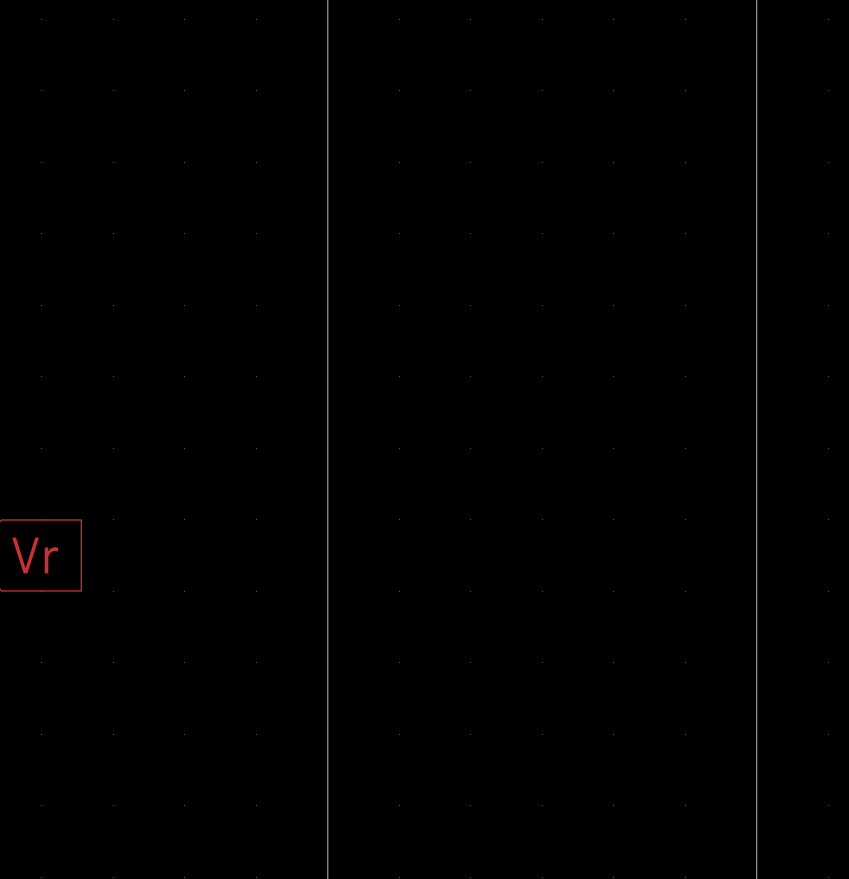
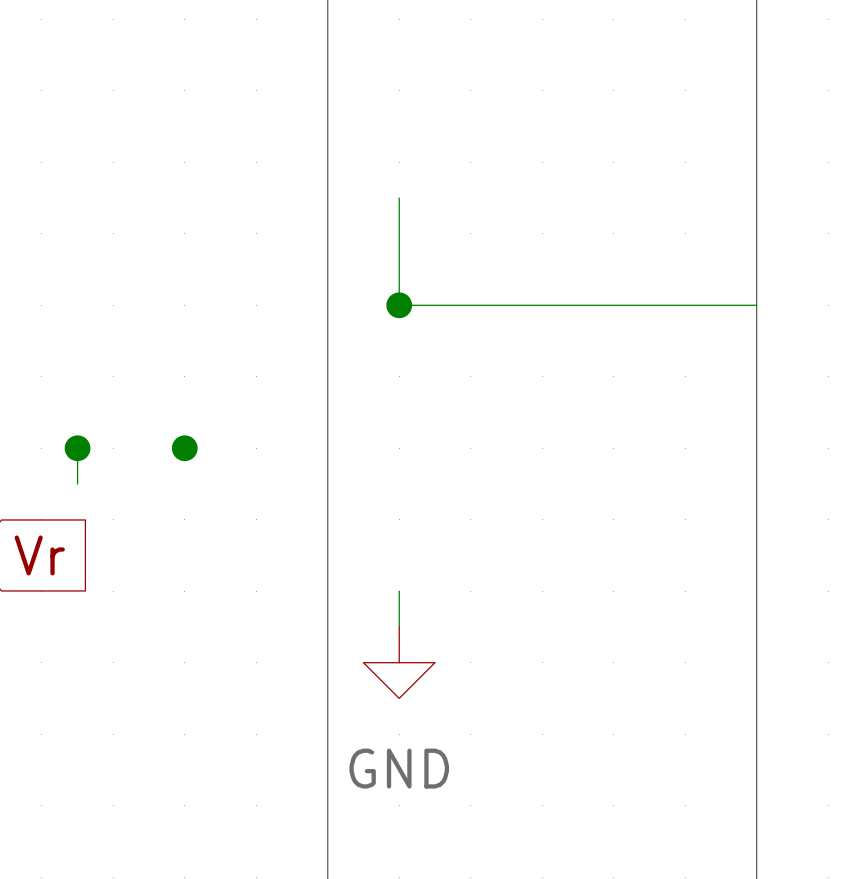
wire: none -> (399, 198) (399, 305) (756, 305)
junction: none -> (399, 305)
wire: none -> (77, 448) (77, 484)
junction: none -> (77, 448)
junction: none -> (184, 448)
wire: none -> (399, 591) (399, 626)
power symbol: none -> GND (399, 662)

